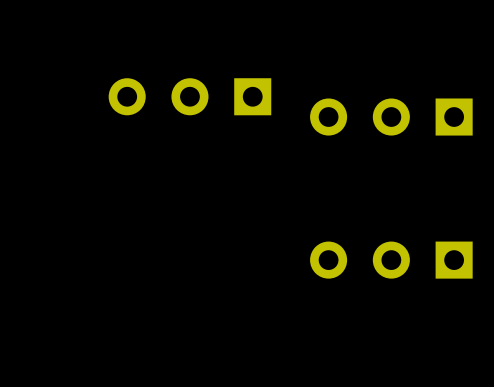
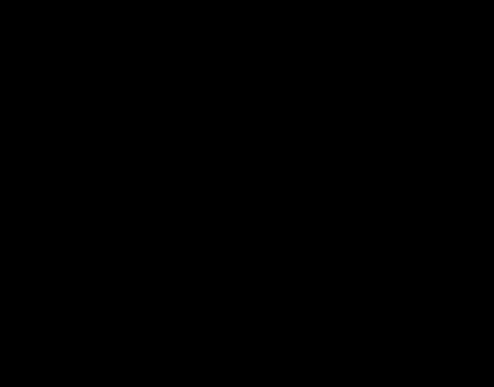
part: (189, 96) -> none
part: (391, 117) -> none
part: (391, 260) -> none

